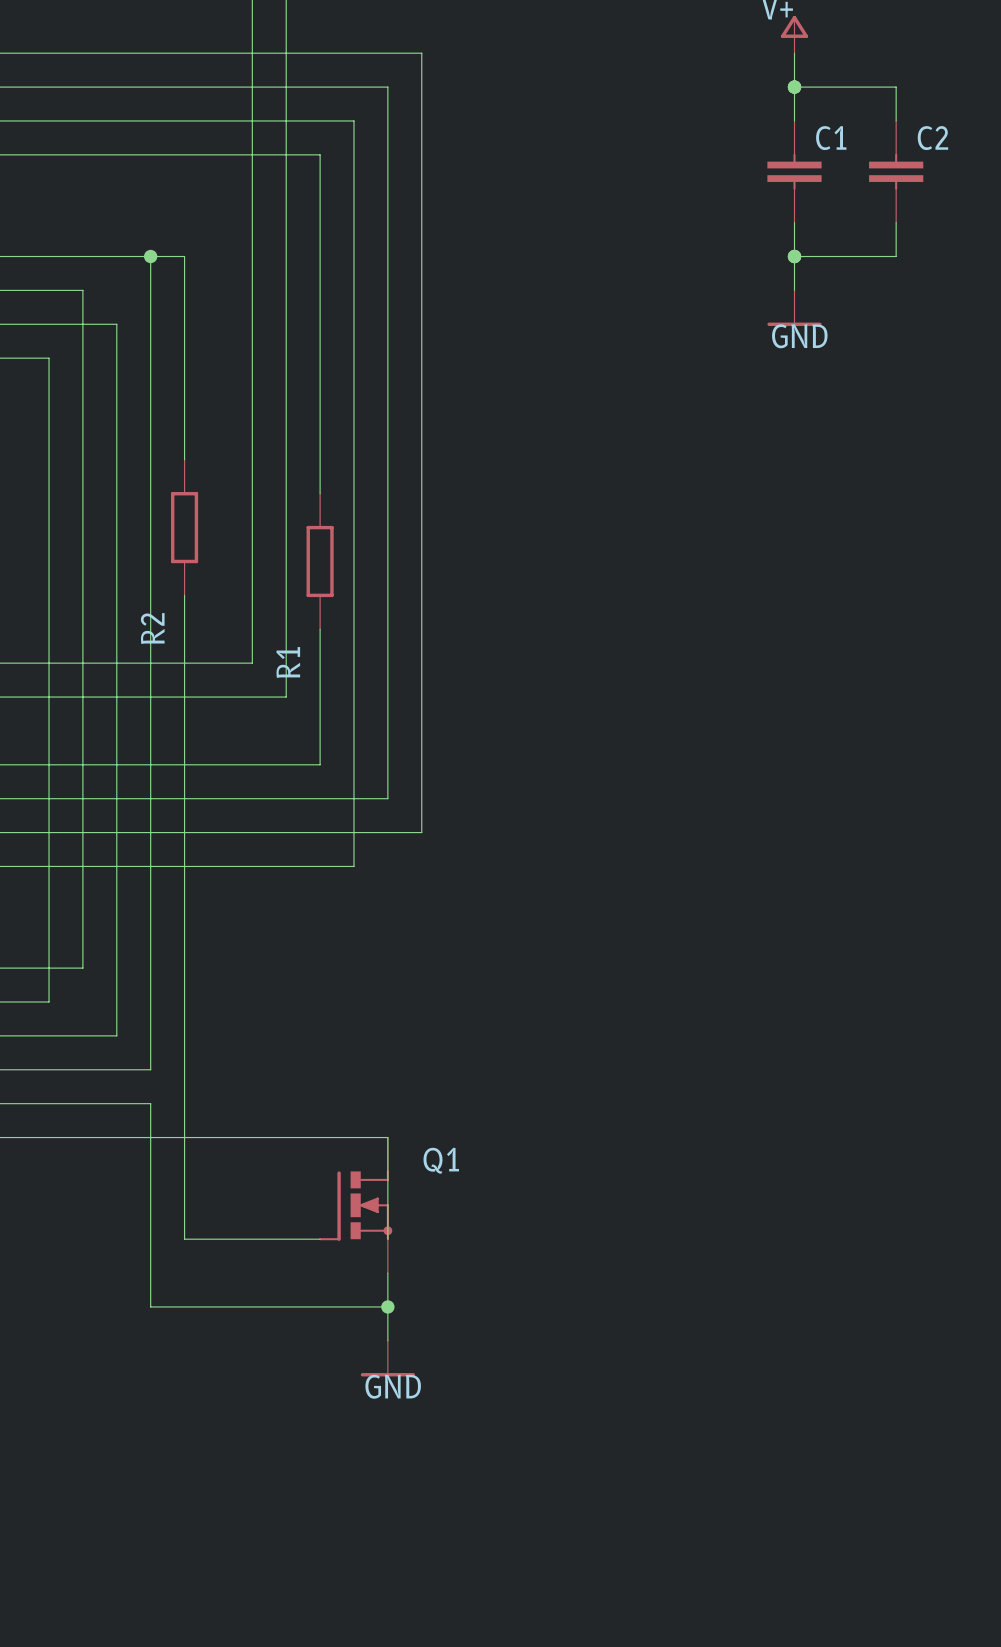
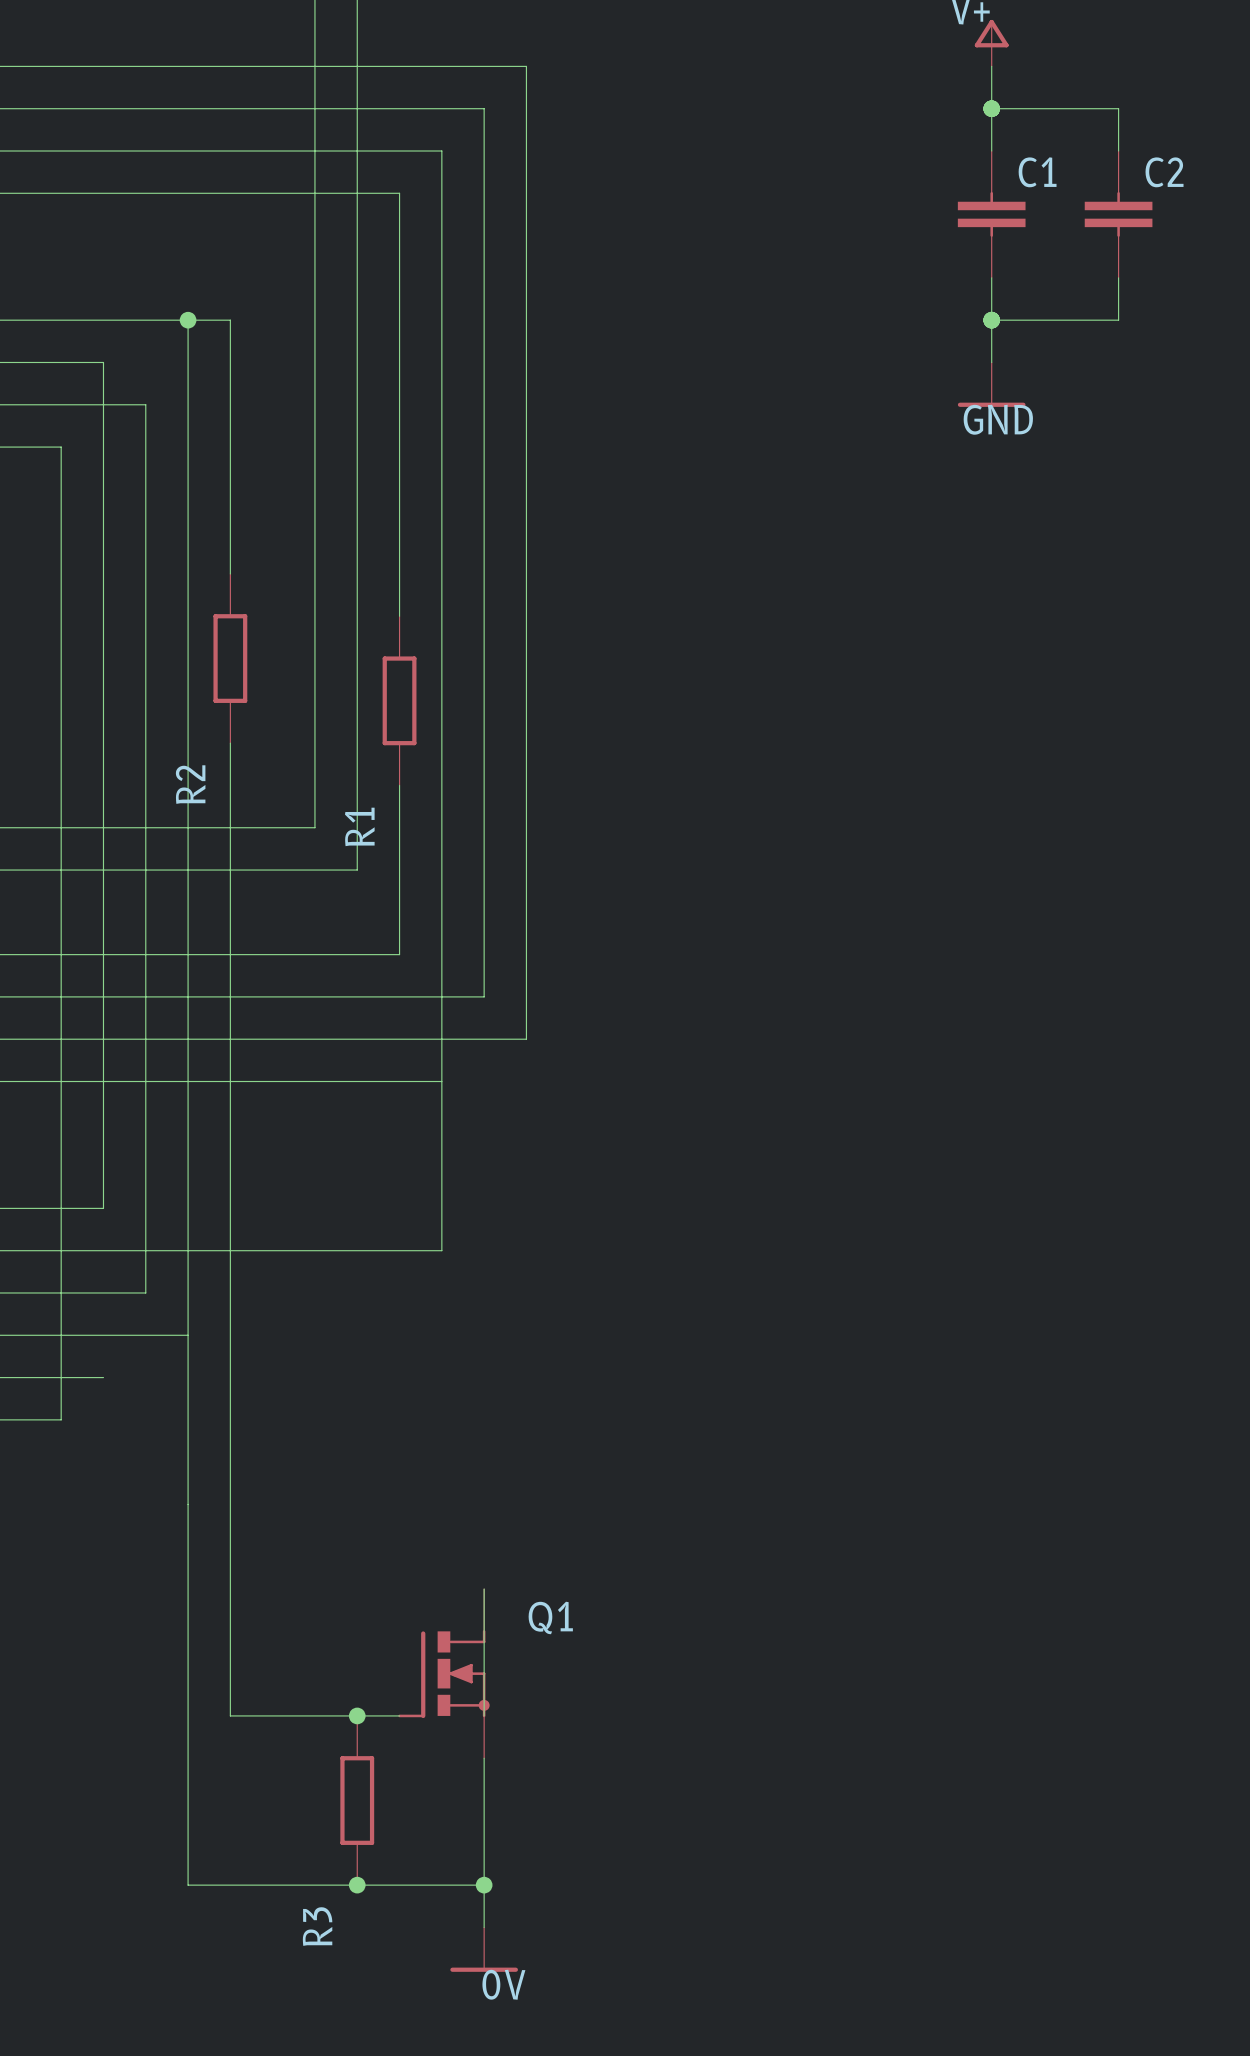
wire: (82, 1103) (150, 1103) -> (188, 1335) (188, 1377)
wire: (49, 1137) (387, 1137) (387, 1239) -> (61, 1419) (61, 1250) (441, 1250) (441, 1081)
Q1 position: (355, 1205) -> (443, 1673)
wire: (184, 1239) (320, 1239) -> (230, 1546) (230, 1715) (399, 1715)
wire: (150, 1306) (387, 1306) -> (188, 1631) (188, 1885) (484, 1885)
junction: (387, 1306) -> none
power symbol: GND (387, 1358) -> none
junction: none -> (357, 1715)
wire: none -> (484, 1758) (484, 1927)
R3: none -> (357, 1800)
junction: none -> (357, 1885)
junction: none -> (484, 1885)
power symbol: none -> 0V (484, 1949)

